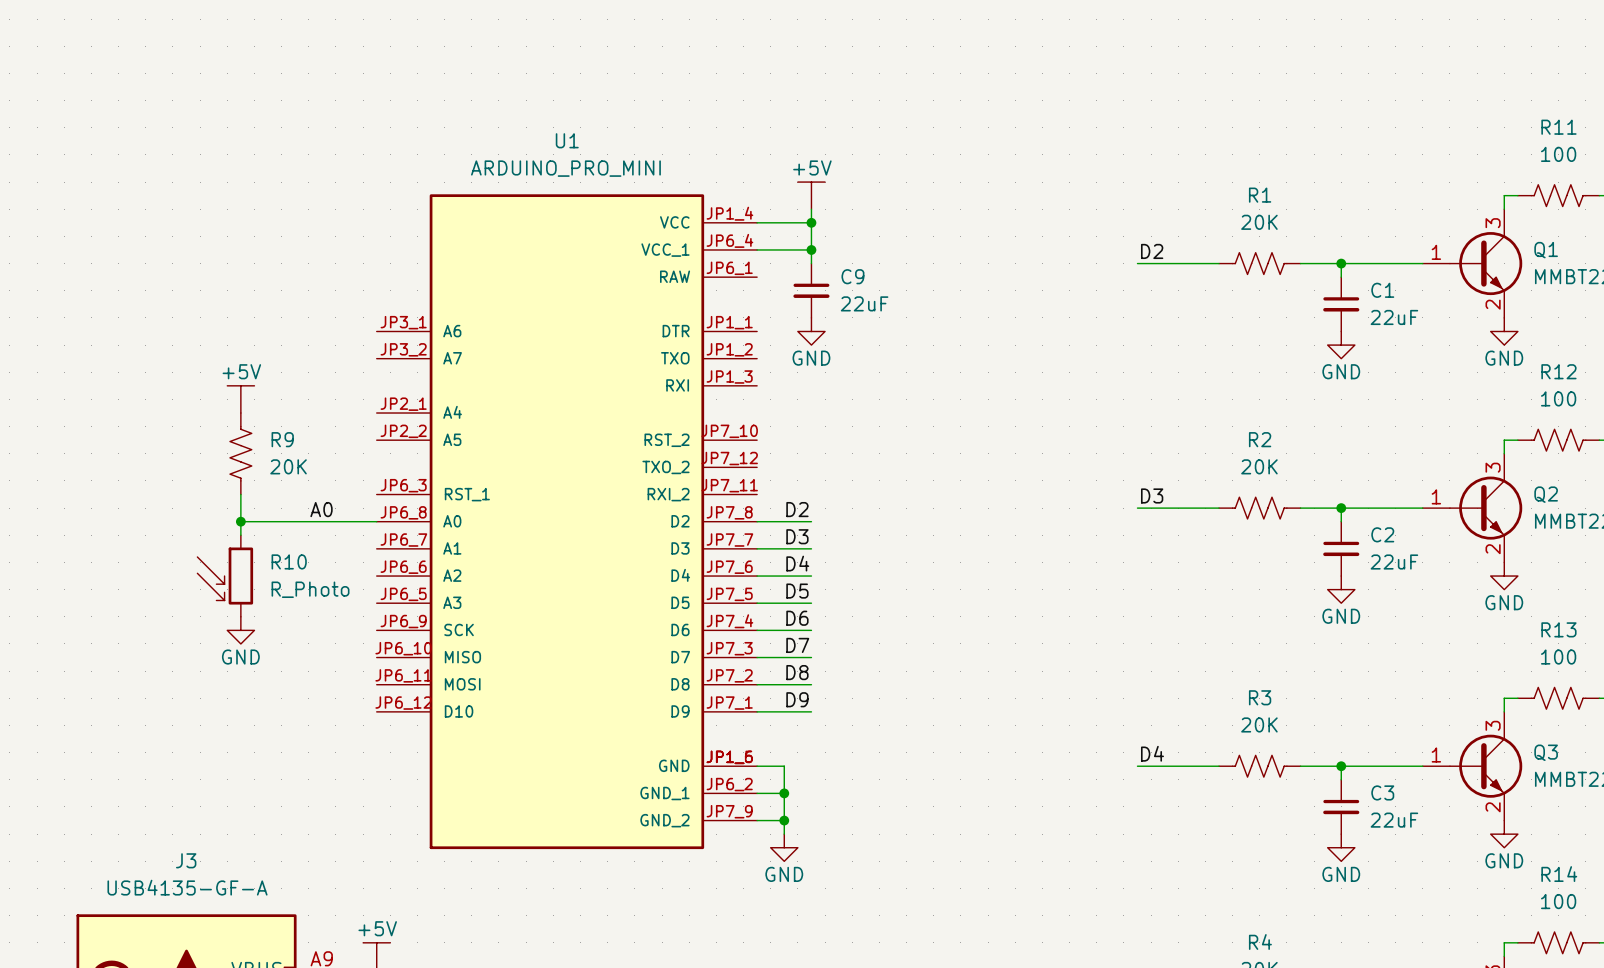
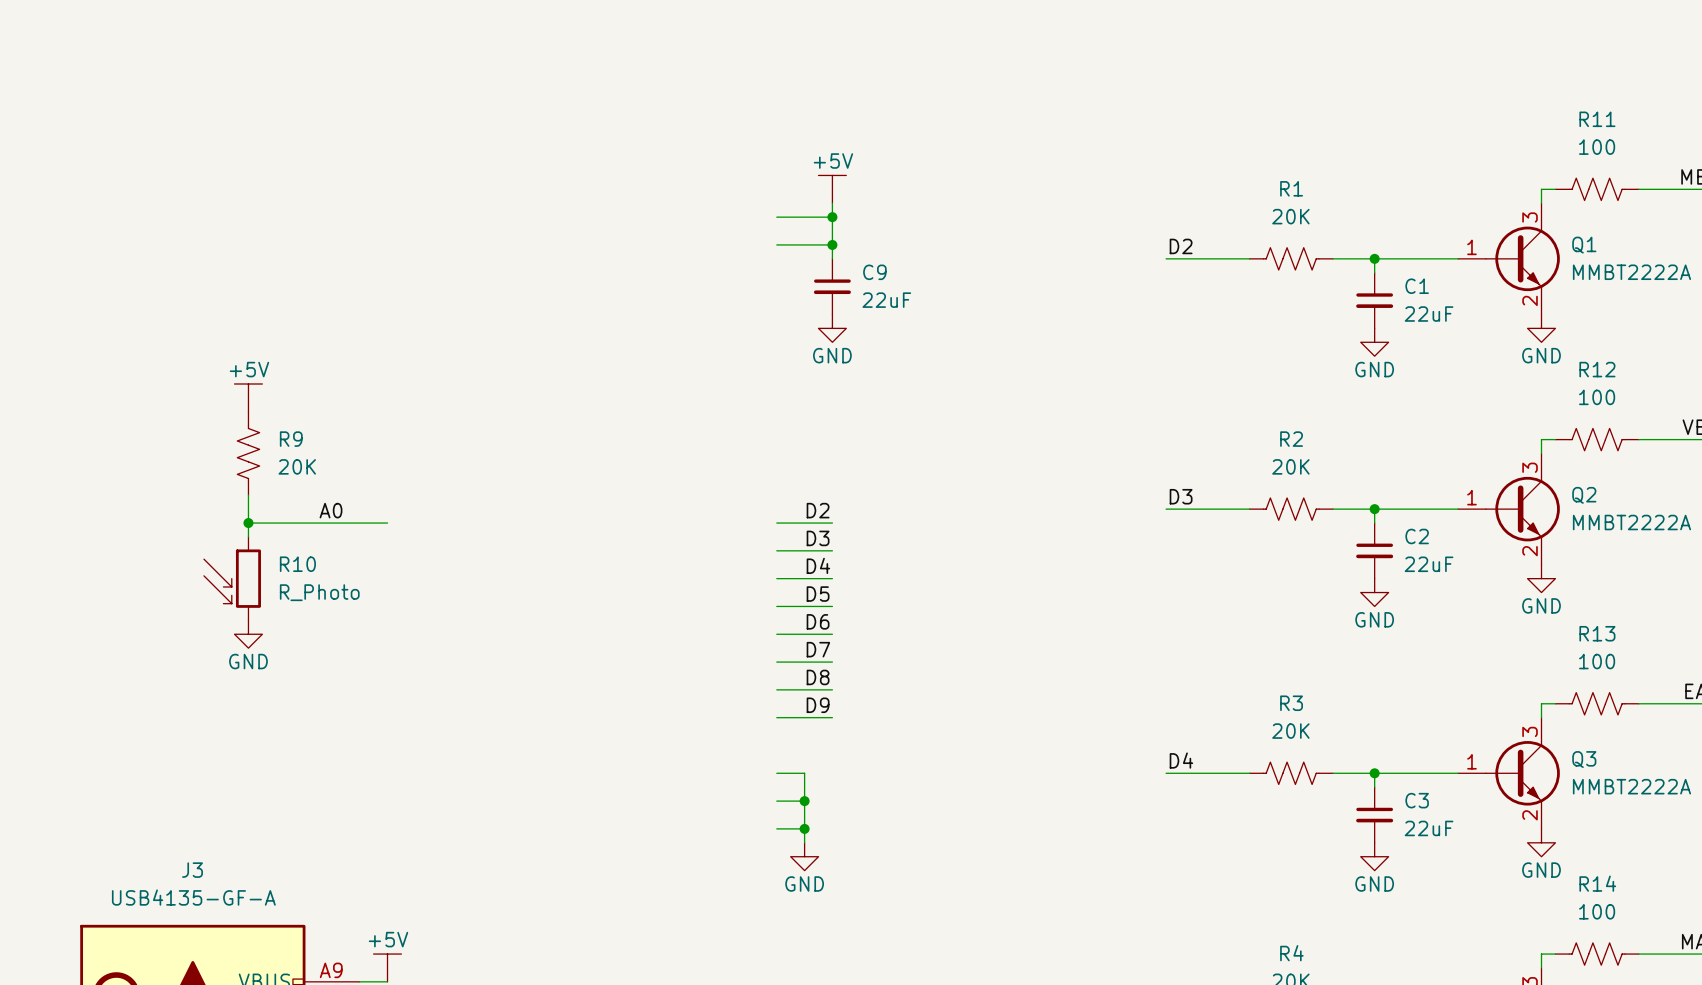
U1: ARDUINO_PRO_MINI (566, 521) -> none

